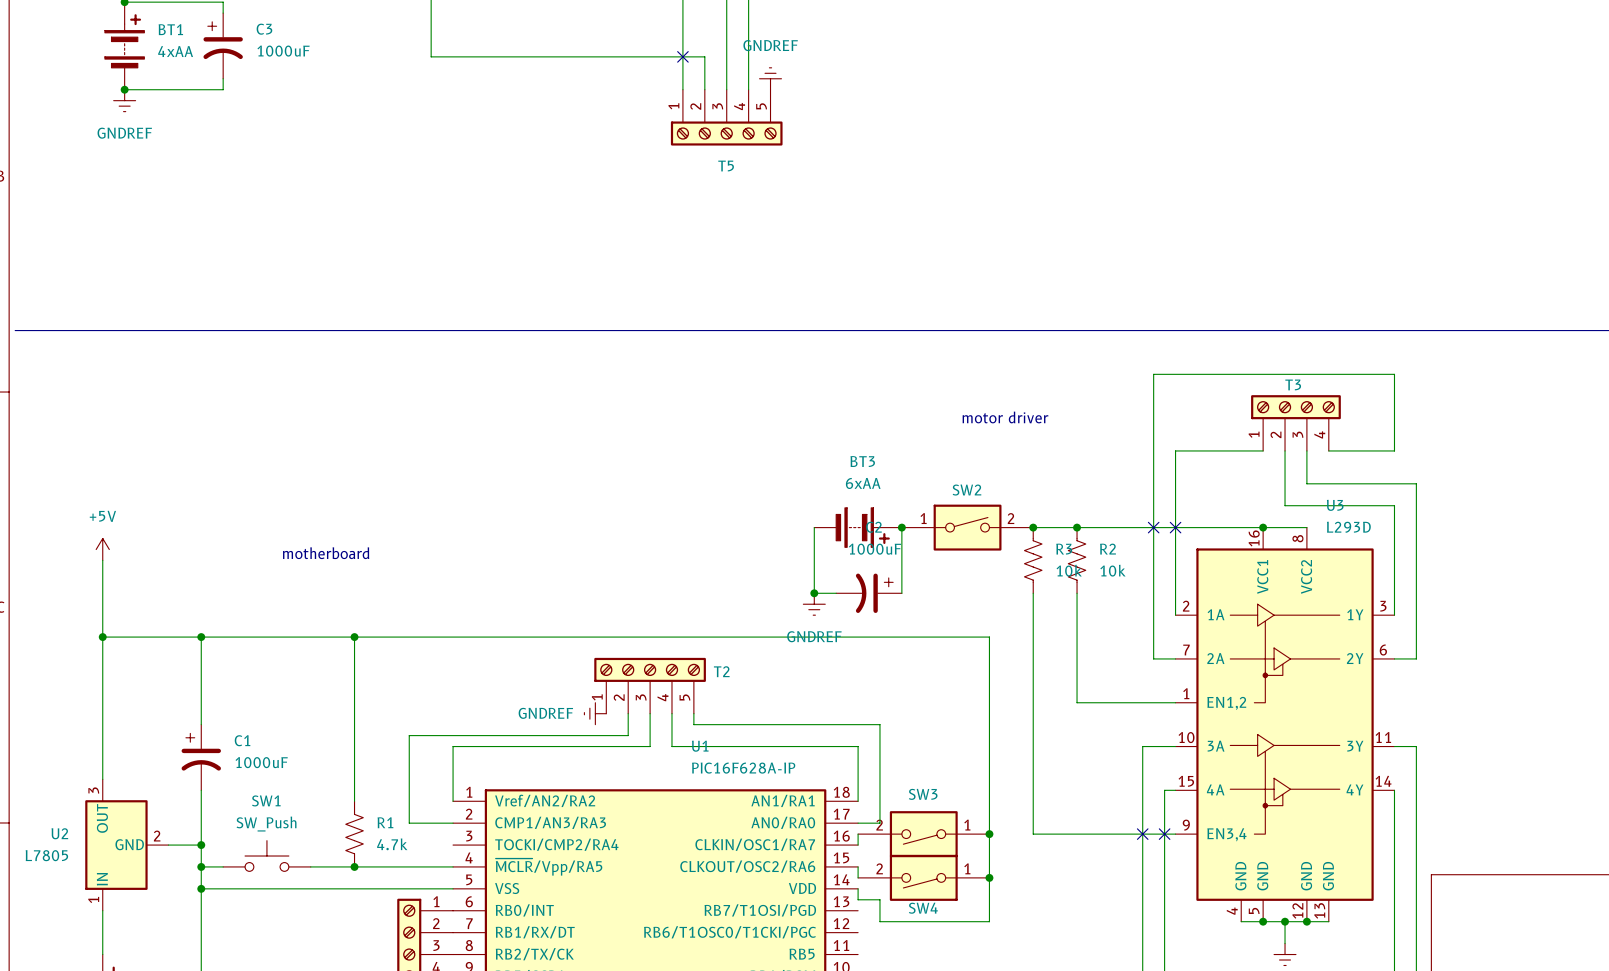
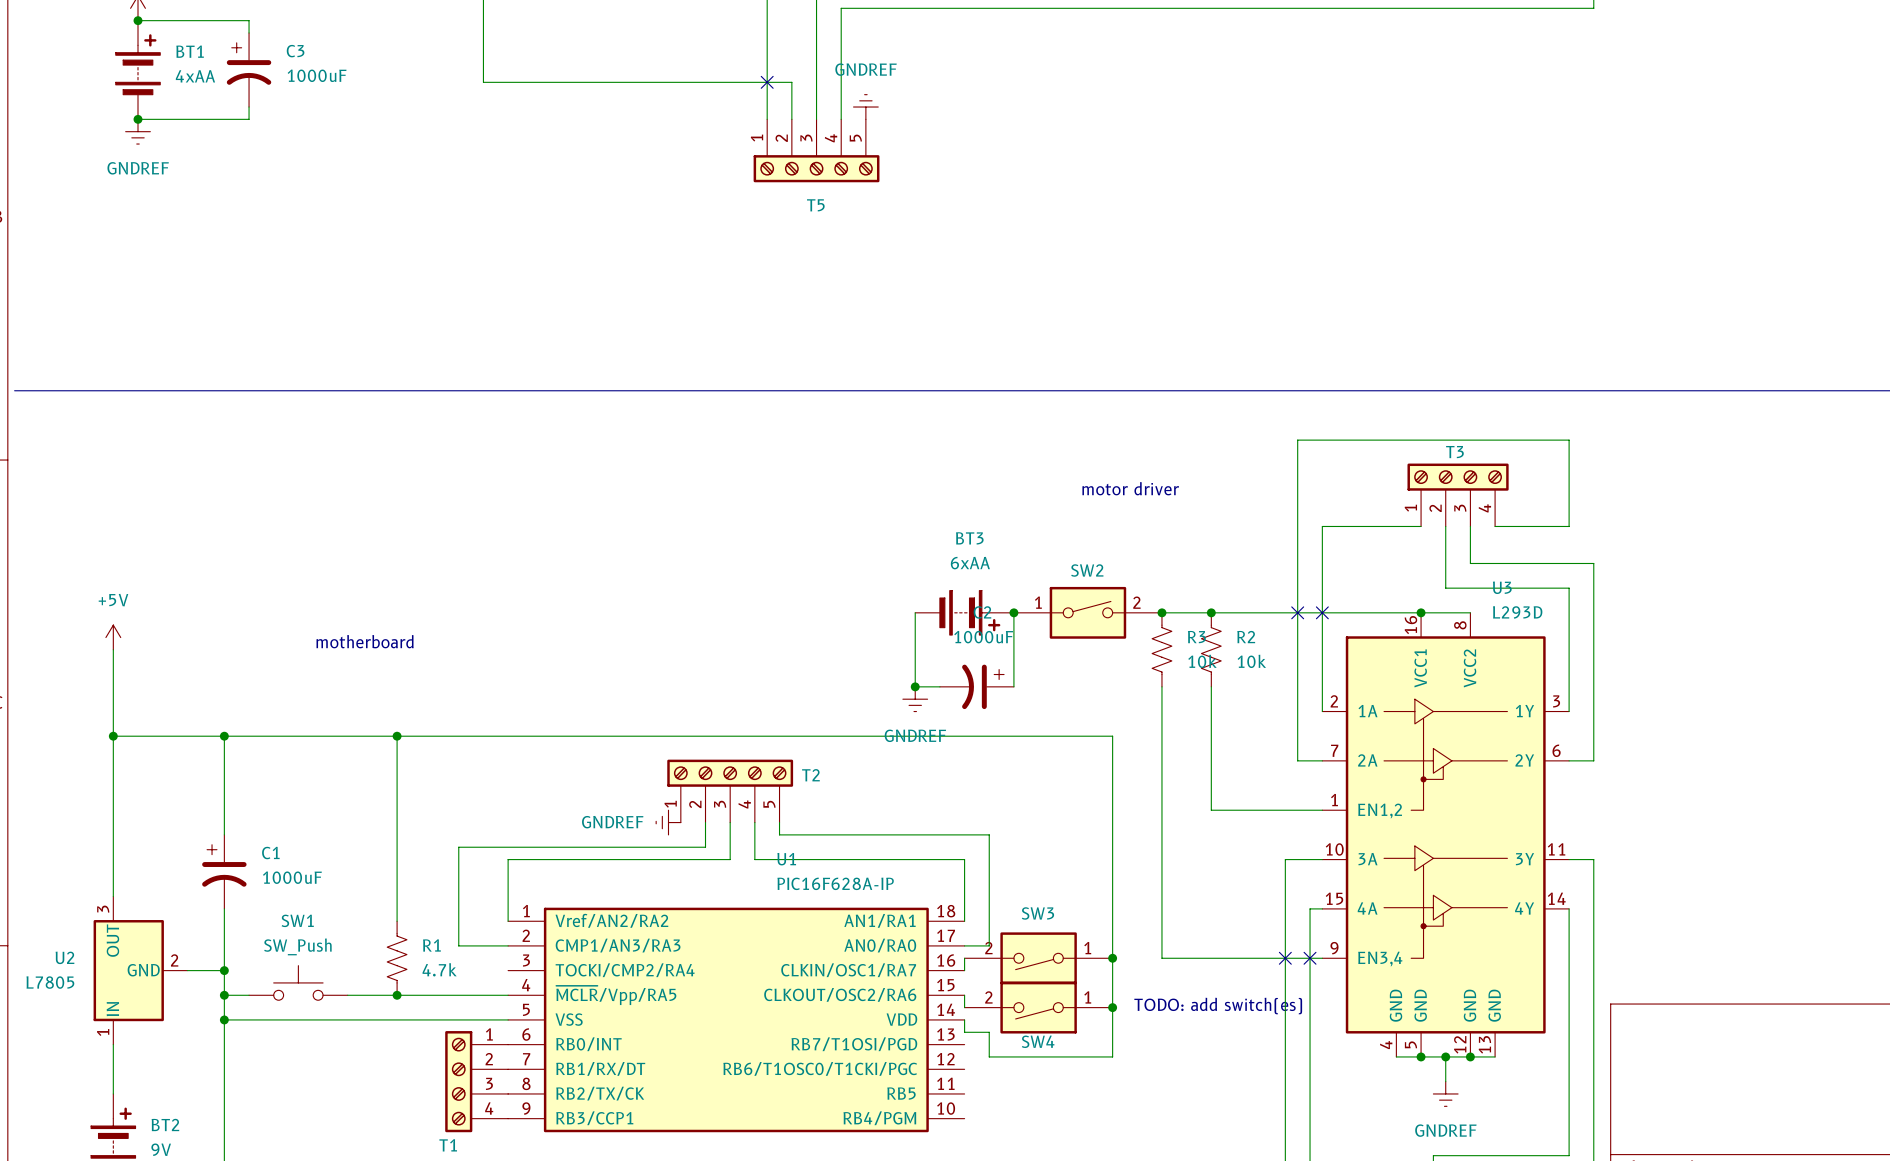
text: none -> TODO: add switch(es) (1218, 1006)

